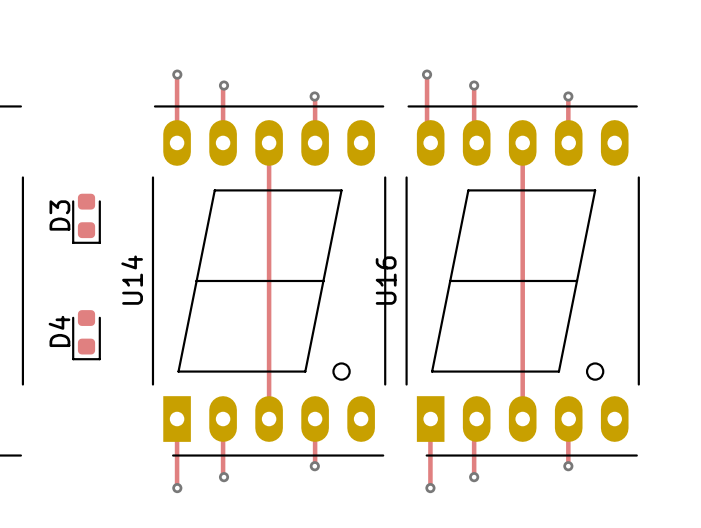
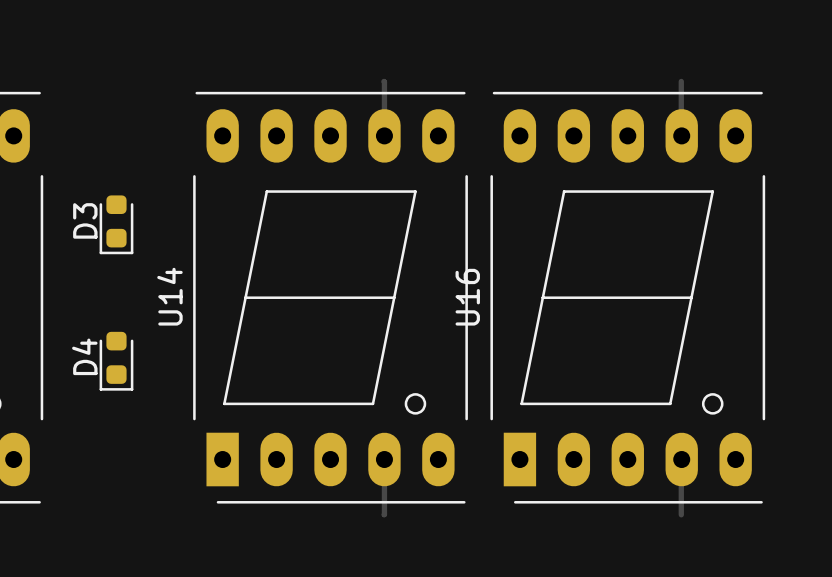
track: (177, 74) (177, 142) -> none
via: (177, 74) -> none
track: (427, 74) (427, 139) (430, 142) -> none
via: (427, 74) -> none
track: (224, 85) (223, 142) -> none
via: (224, 85) -> none
track: (474, 85) (474, 140) (476, 142) -> none
via: (474, 85) -> none
via: (314, 96) -> none
via: (568, 96) -> none
track: (269, 142) (269, 419) -> none
track: (522, 142) (522, 419) -> none
track: (177, 419) (177, 487) -> none
track: (223, 419) (224, 477) -> none
track: (430, 419) (430, 488) -> none
track: (476, 419) (474, 421) (474, 477) -> none
via: (314, 466) -> none
via: (568, 466) -> none
via: (224, 477) -> none
via: (474, 477) -> none
via: (177, 488) -> none
via: (430, 488) -> none

